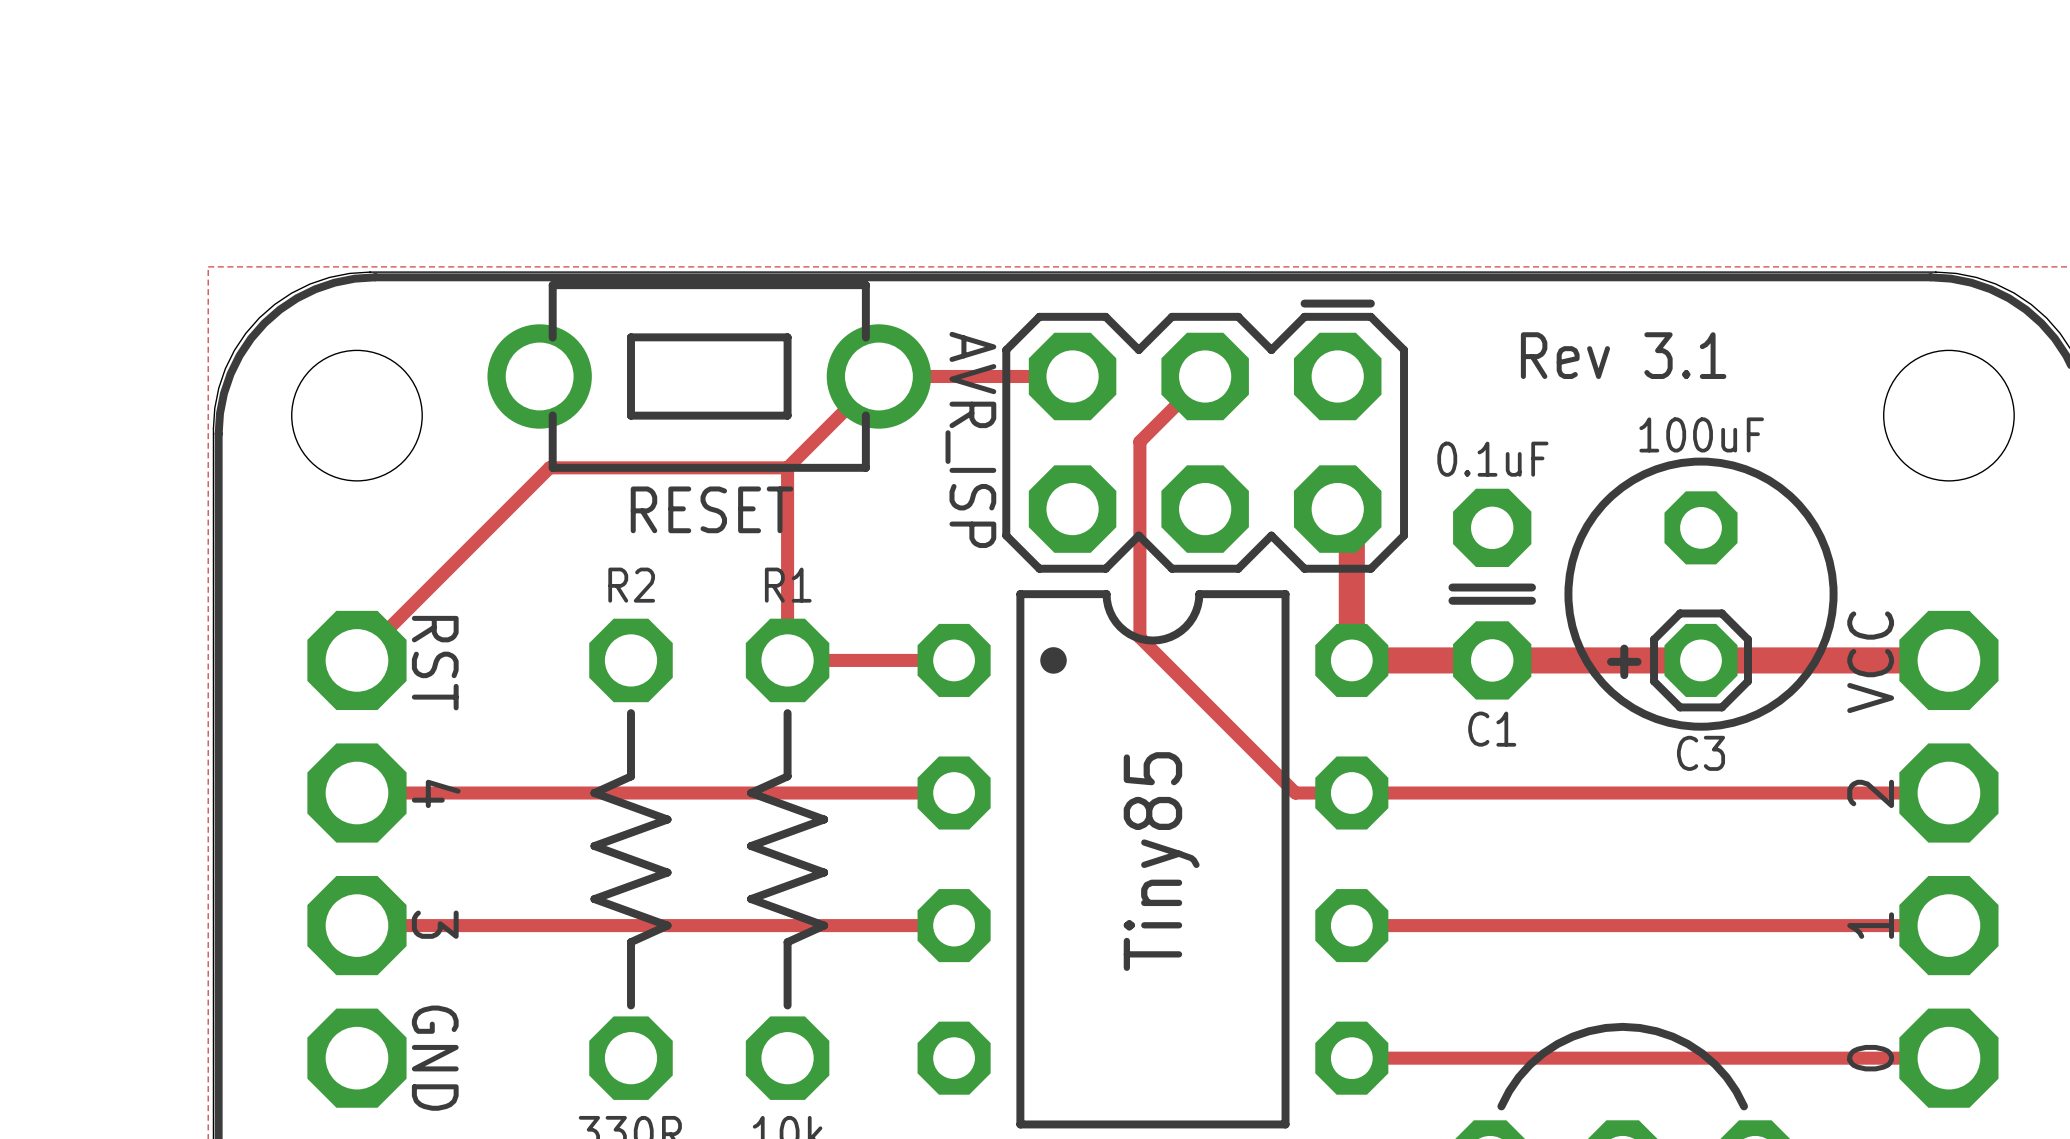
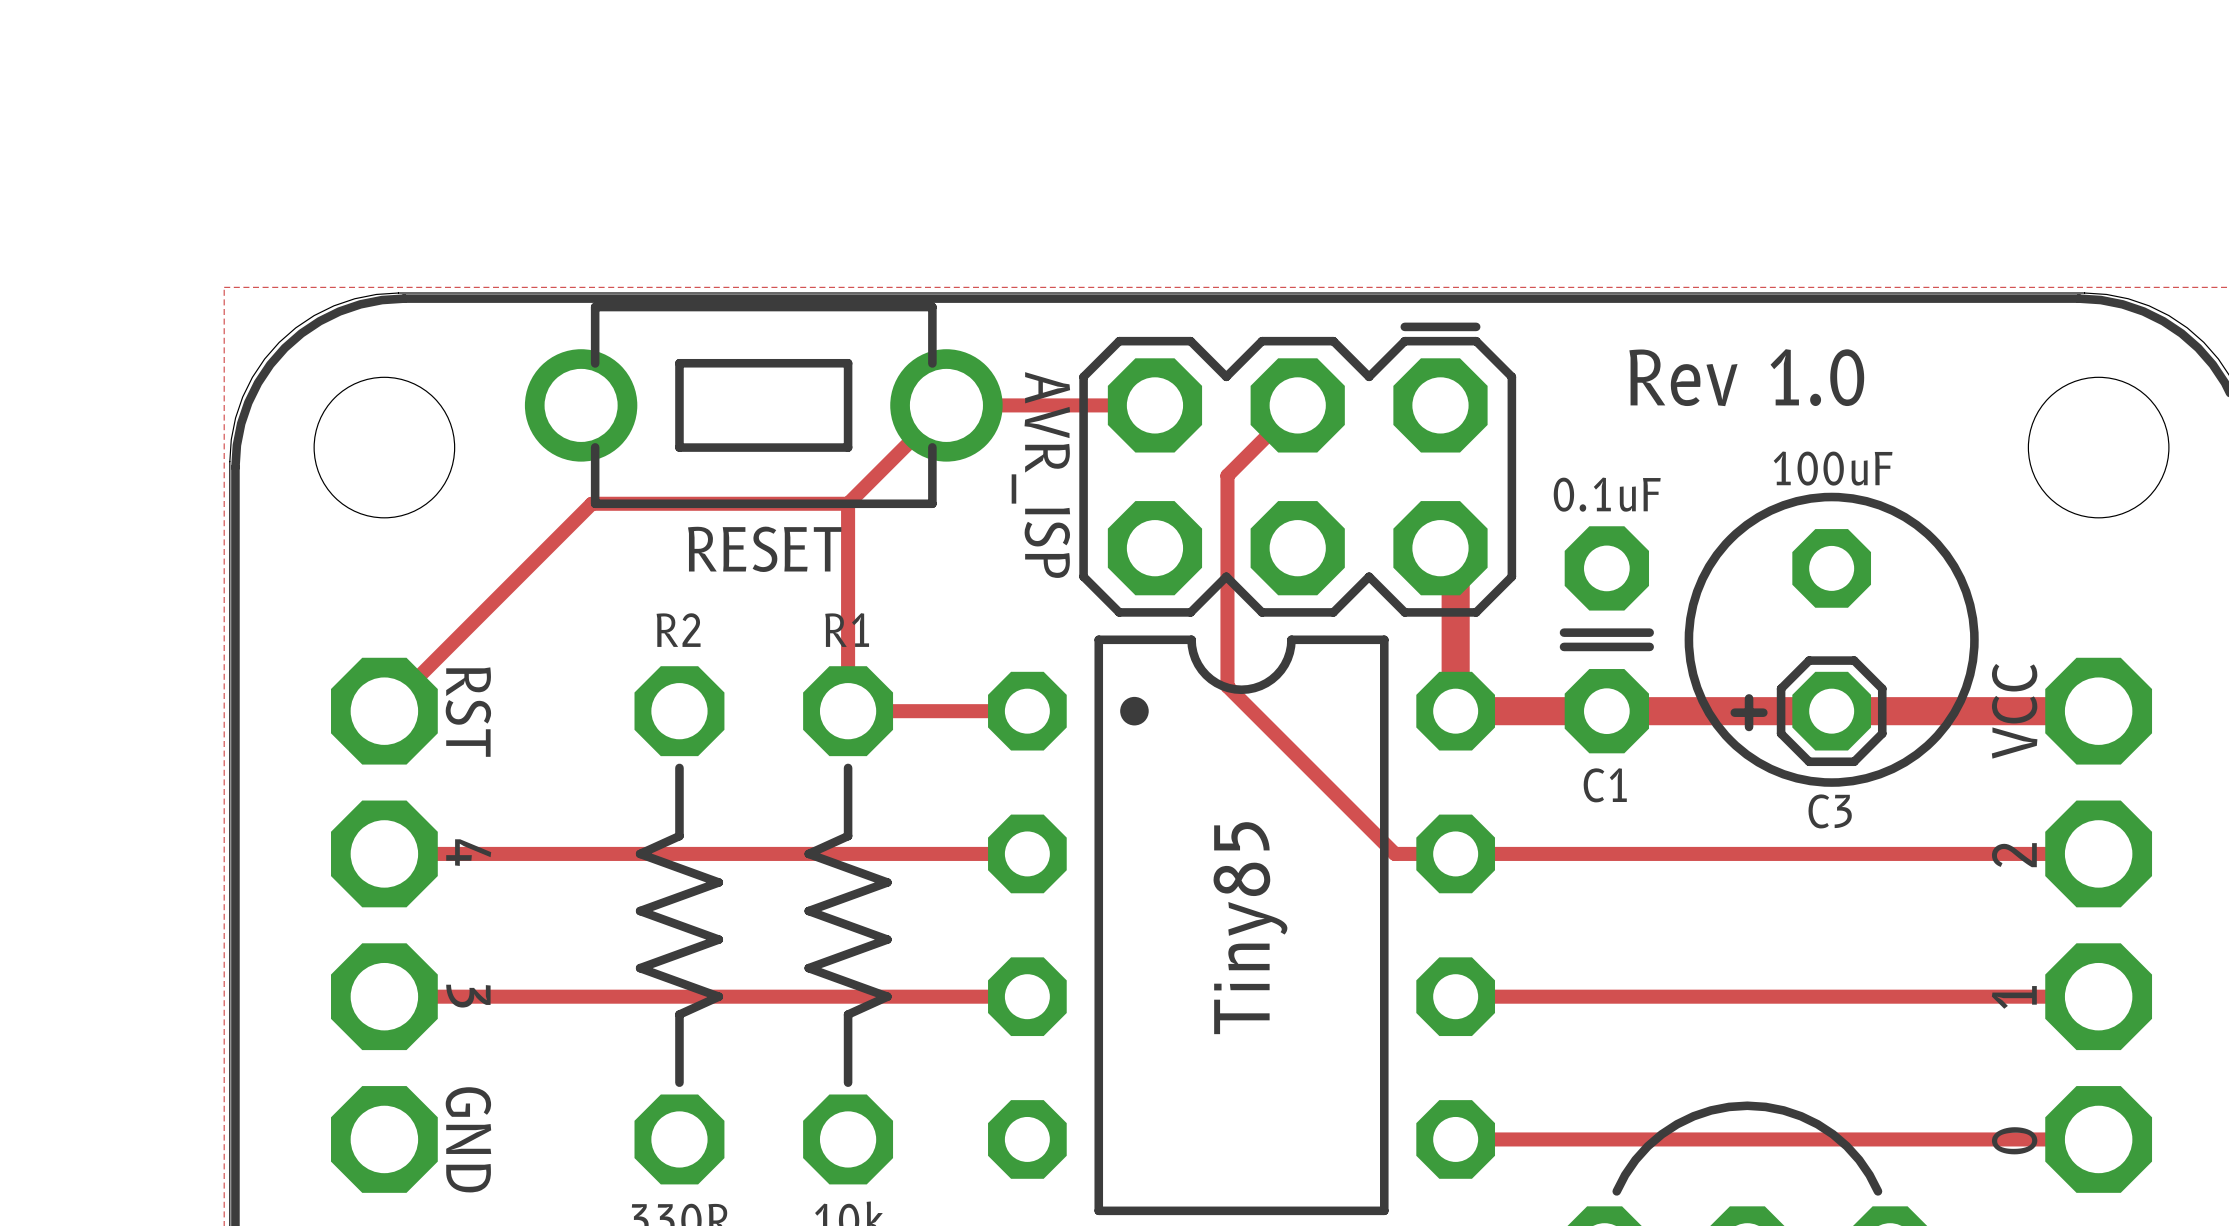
text: Rev 3.1 (1623, 355) -> Rev 1.0 (1746, 377)

